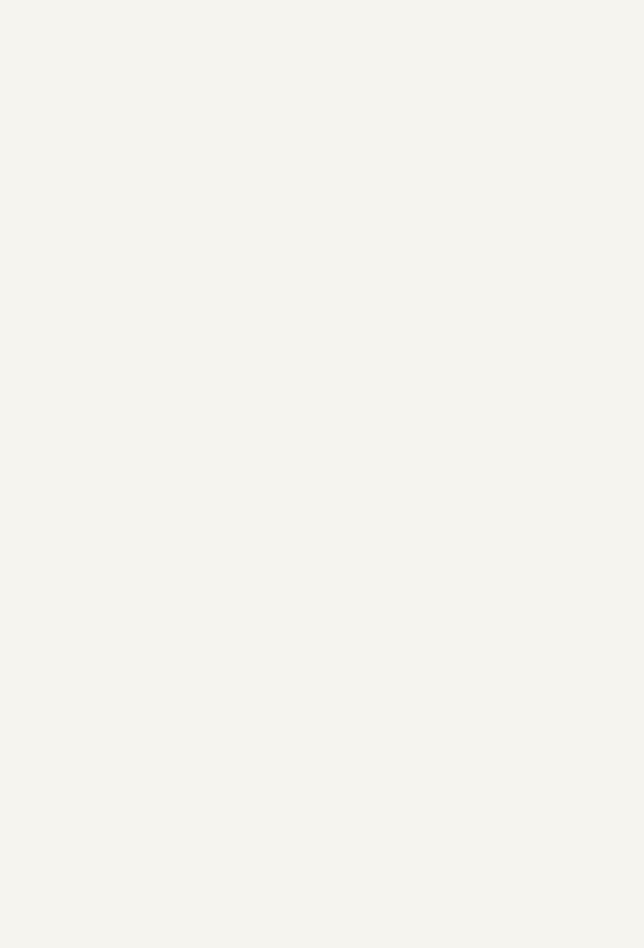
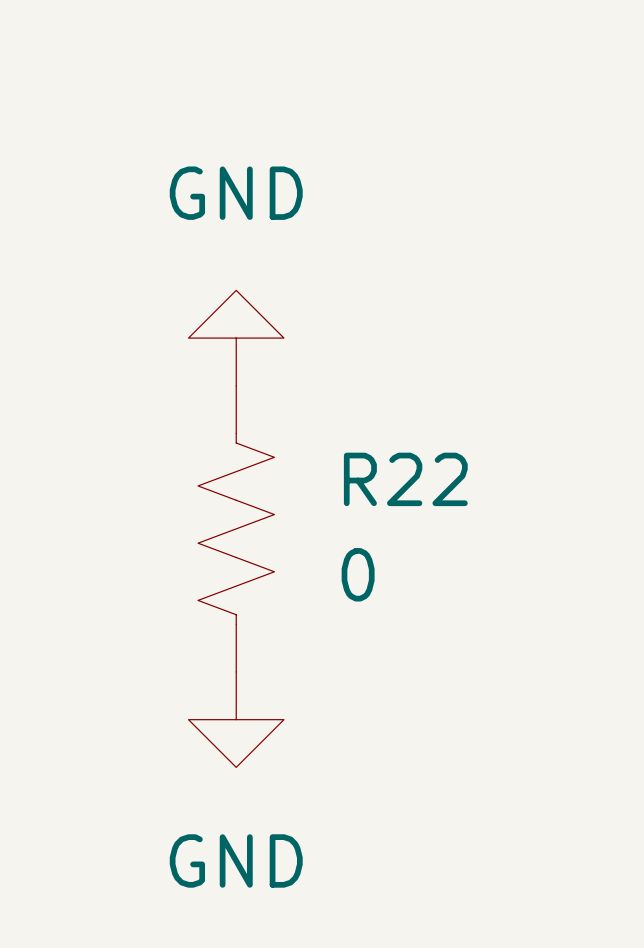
power symbol: none -> GND (236, 338)
R22: none -> 0 (236, 528)
power symbol: none -> GND (236, 719)

